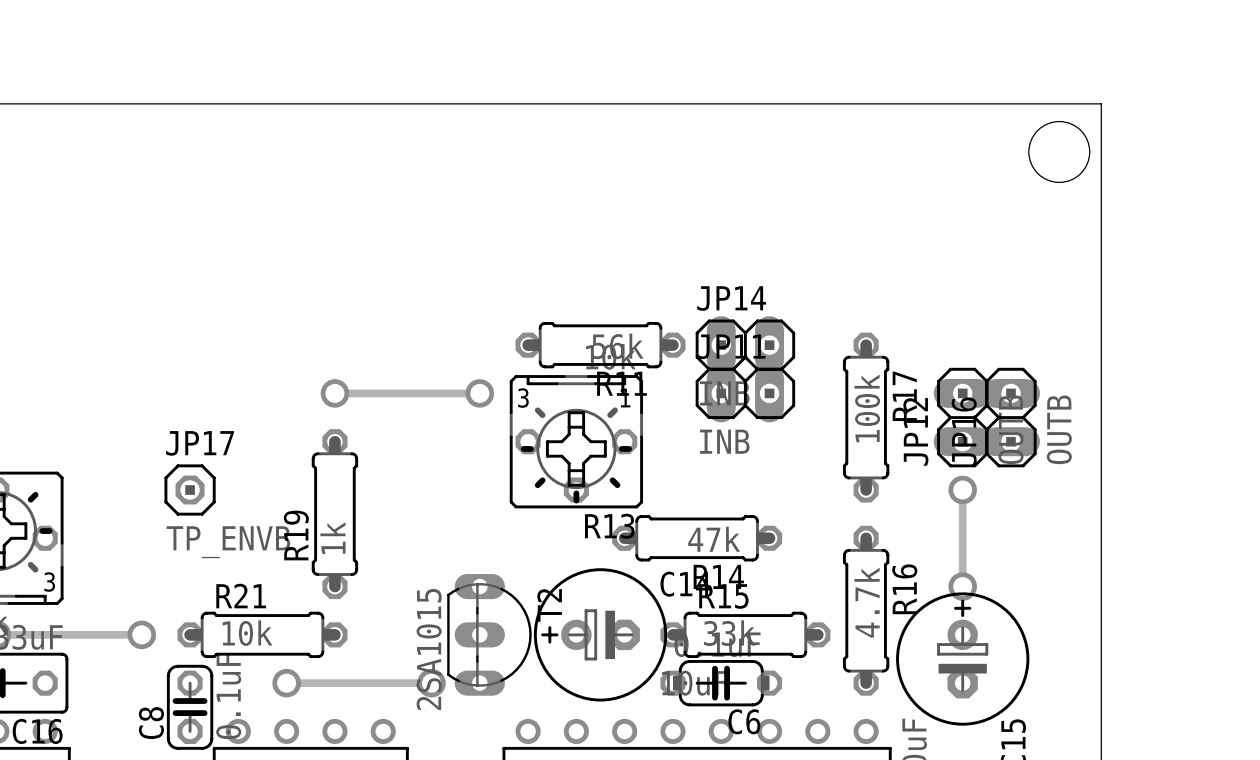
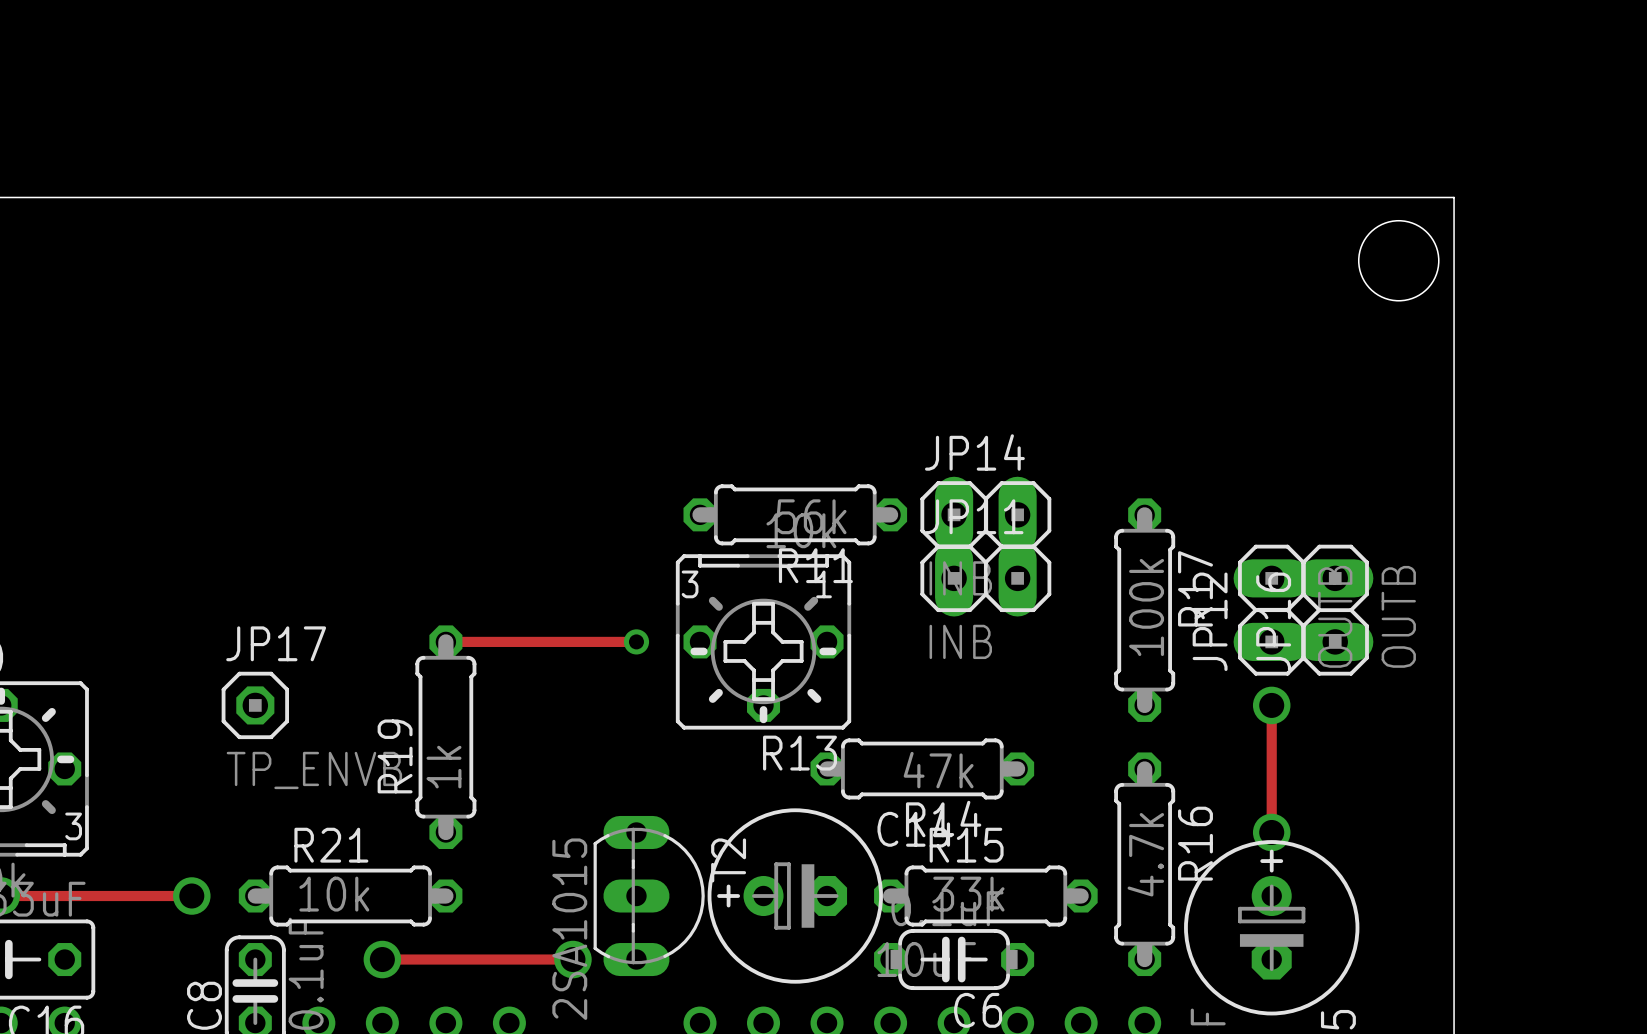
track: (334, 393) (479, 393) -> (445, 641) (636, 641)
via: (334, 393) -> none
via: (479, 393) -> none
via: none -> (636, 641)

